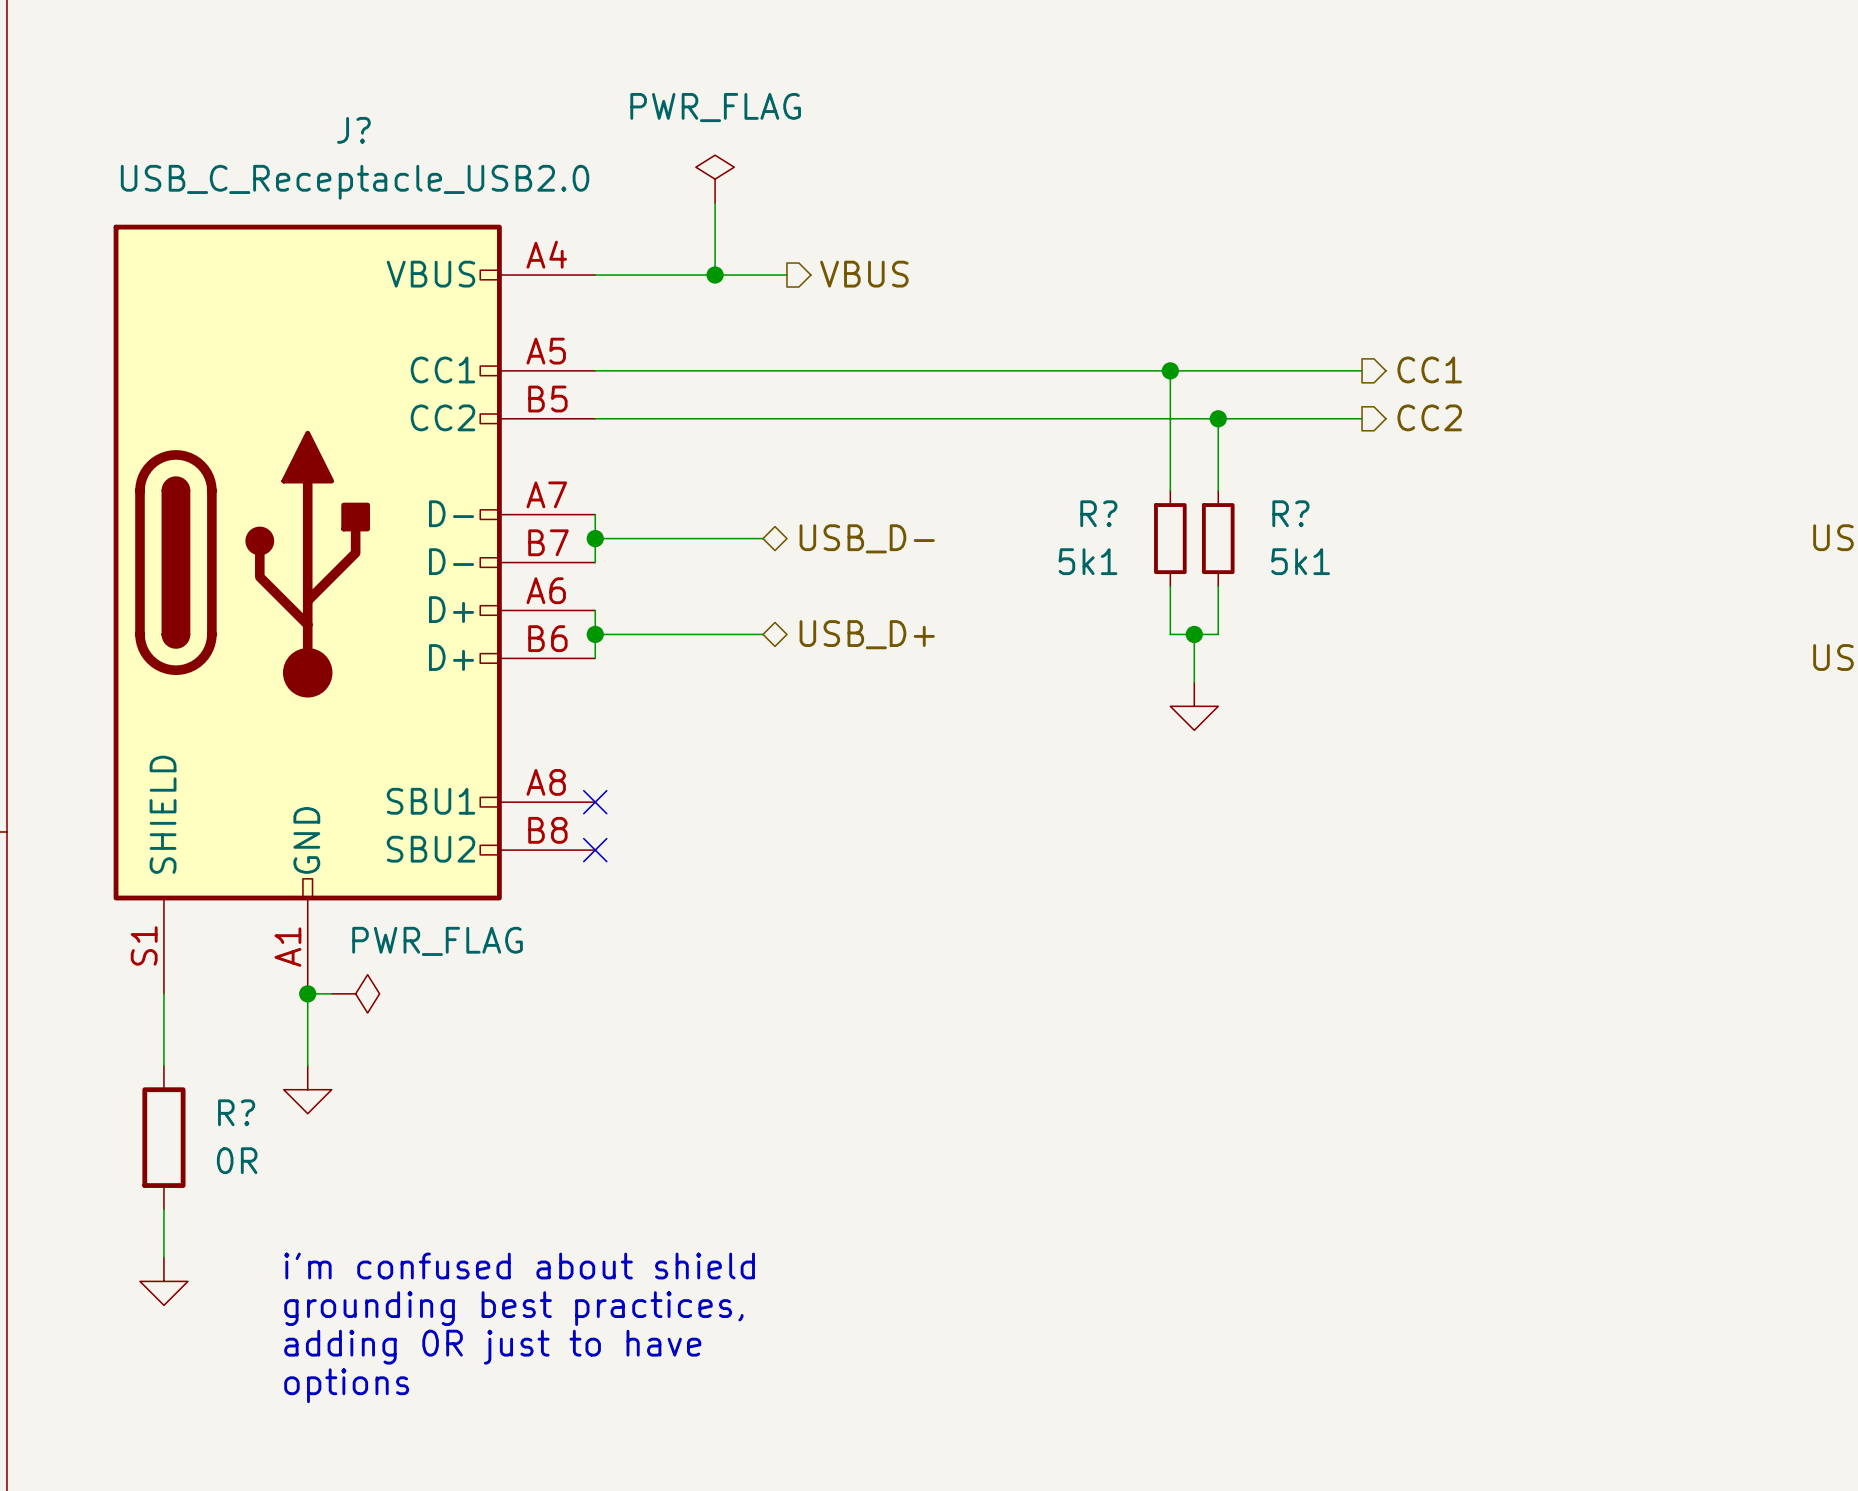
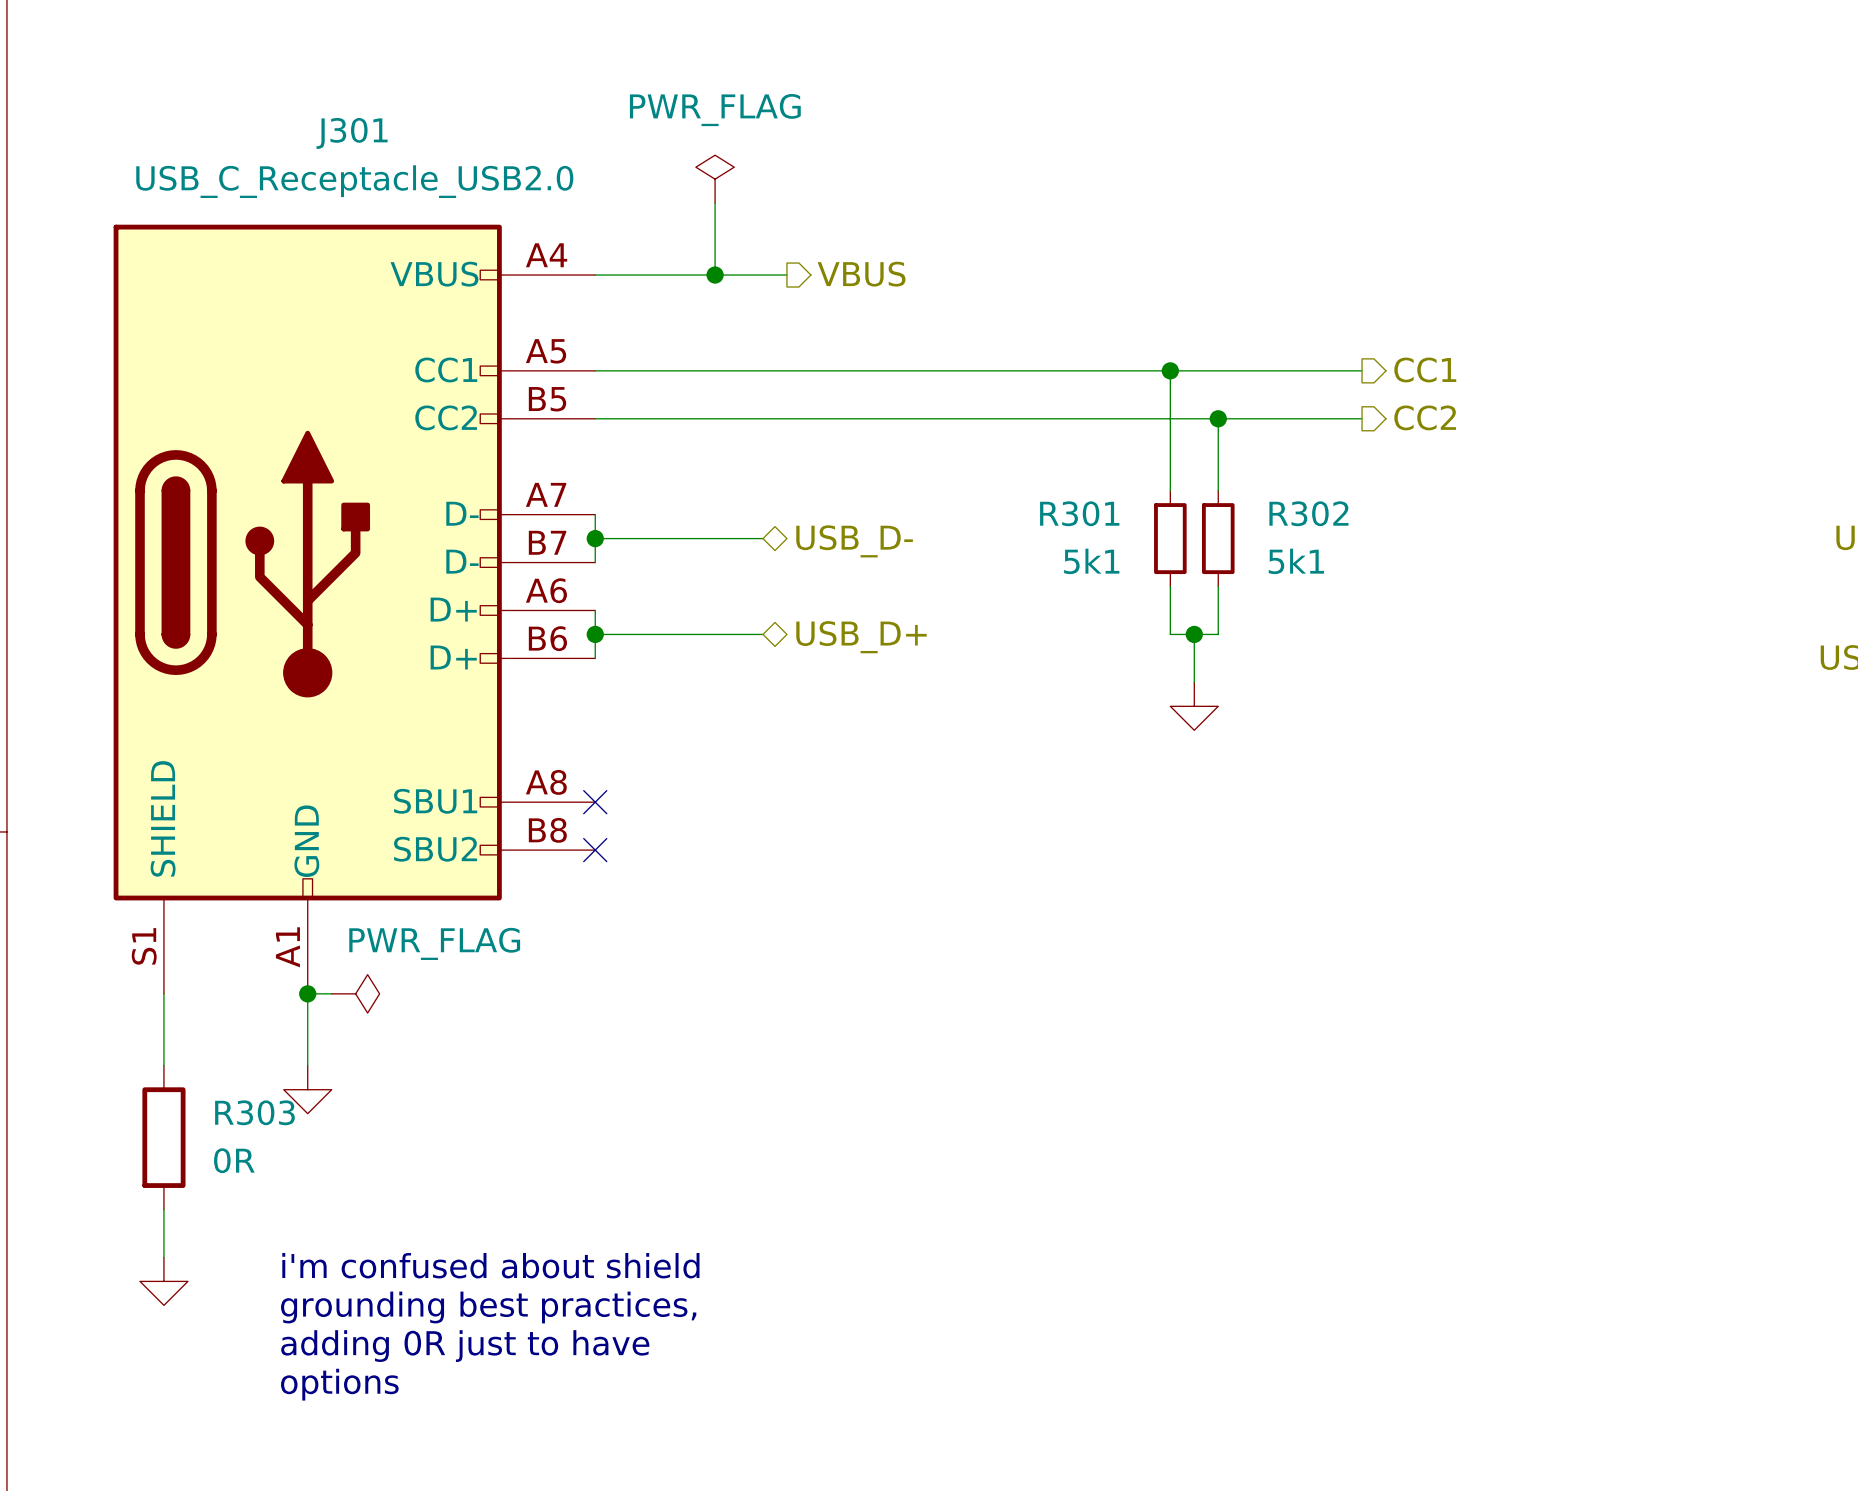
J? name: J? (353, 130) -> J301 (352, 133)
R? name: R? (1098, 513) -> R301 (1079, 513)
R? name: R? (1290, 513) -> R302 (1308, 513)
R? name: R? (236, 1112) -> R303 (254, 1112)

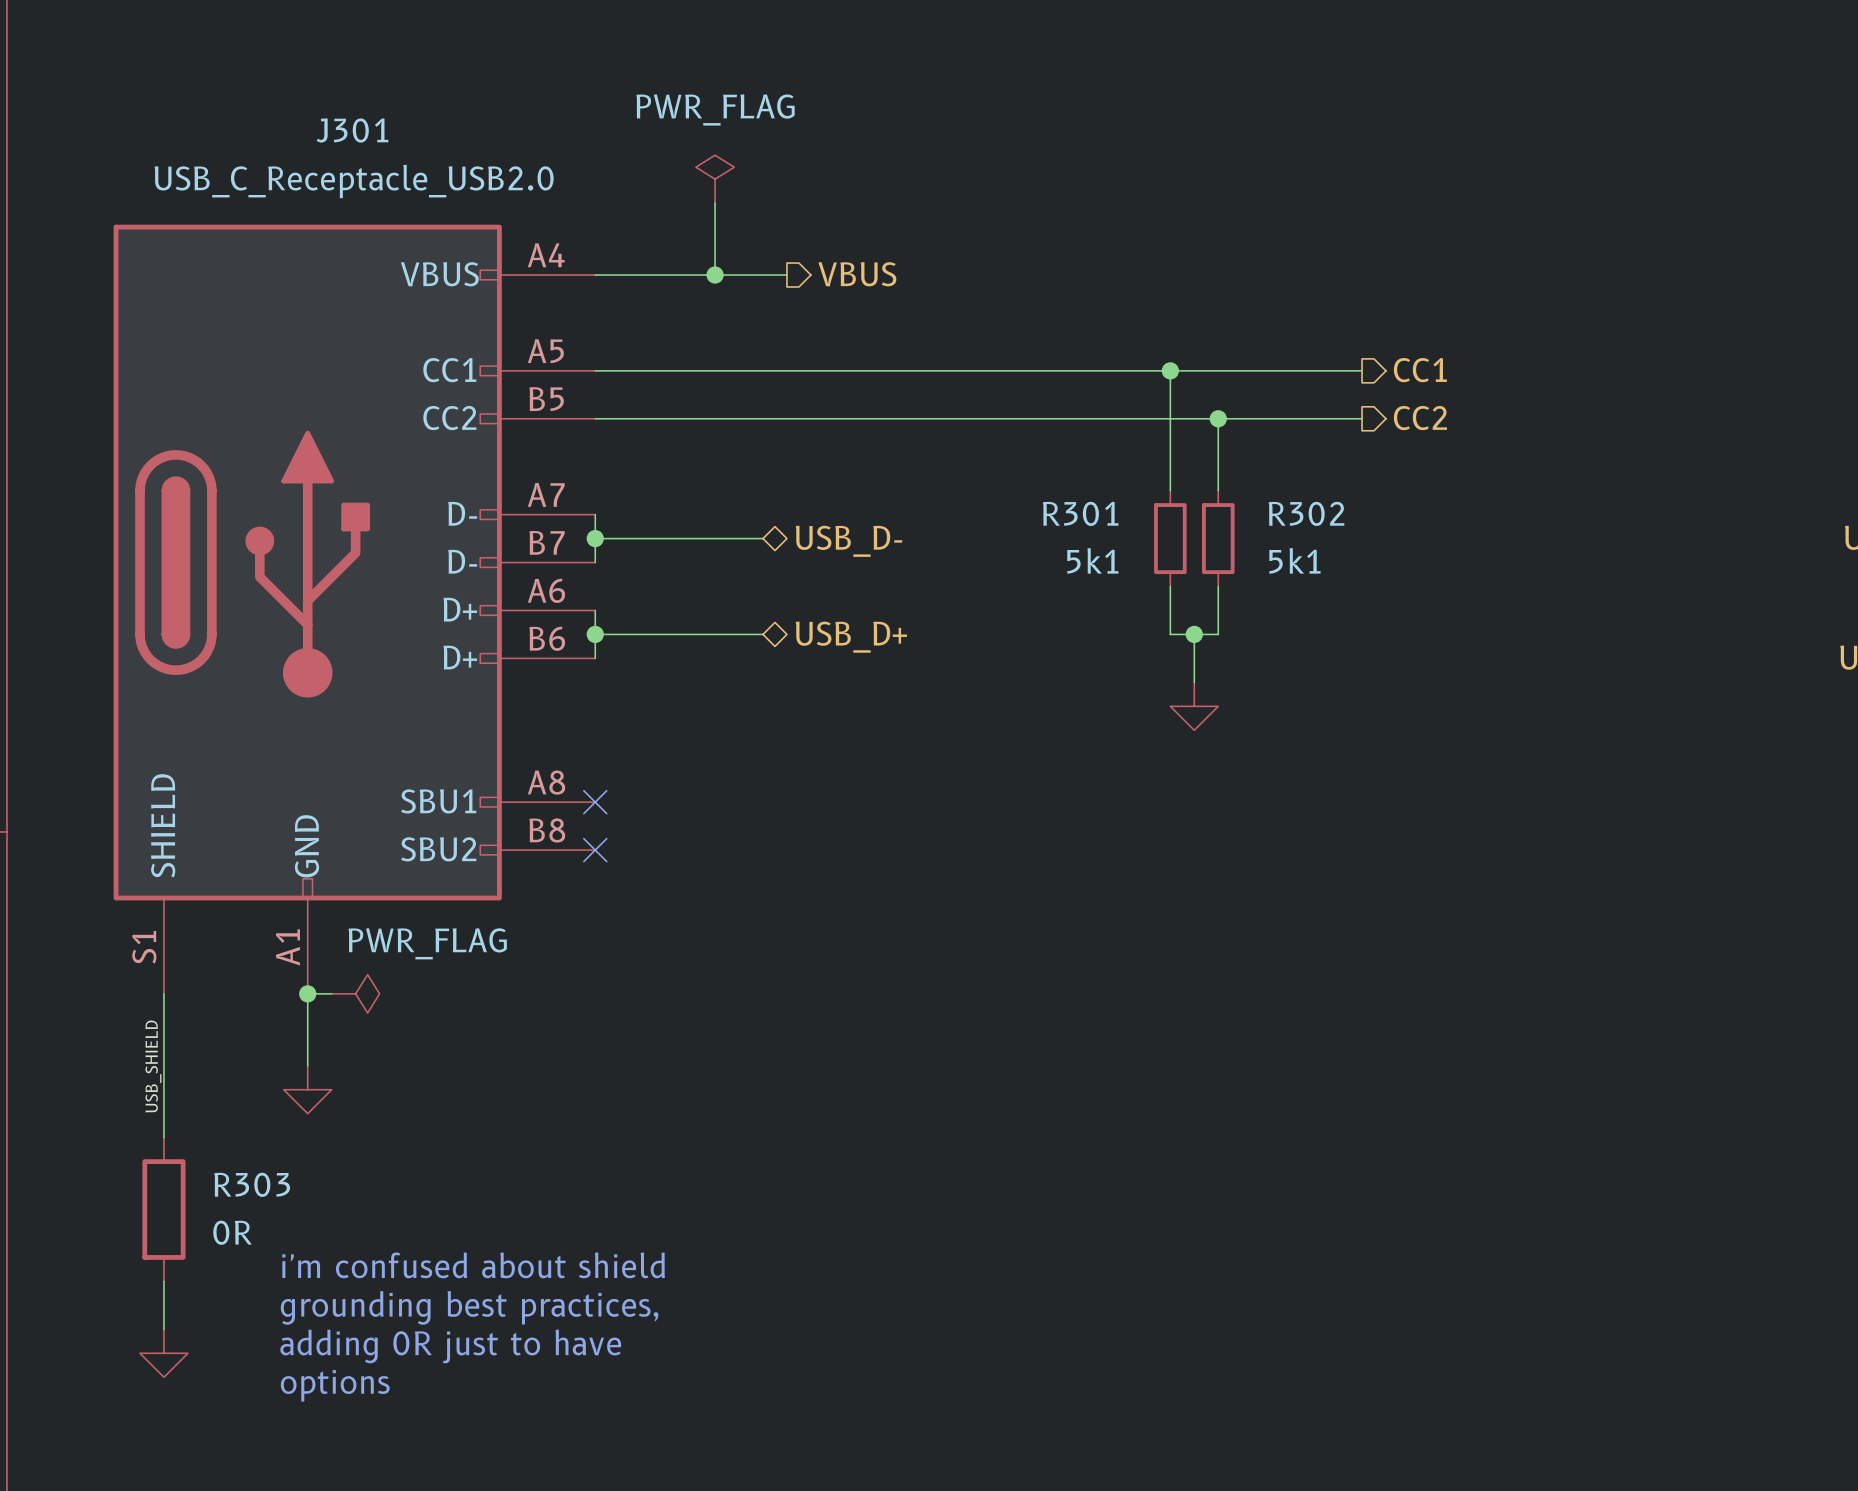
label: none -> USB_SHIELD (153, 1066)
wire: none -> (163, 1065) (163, 1137)
R303 position: (163, 1137) -> (163, 1209)
wire: (163, 1209) (163, 1257) -> (163, 1281) (163, 1329)
power symbol position: (163, 1281) -> (163, 1353)

